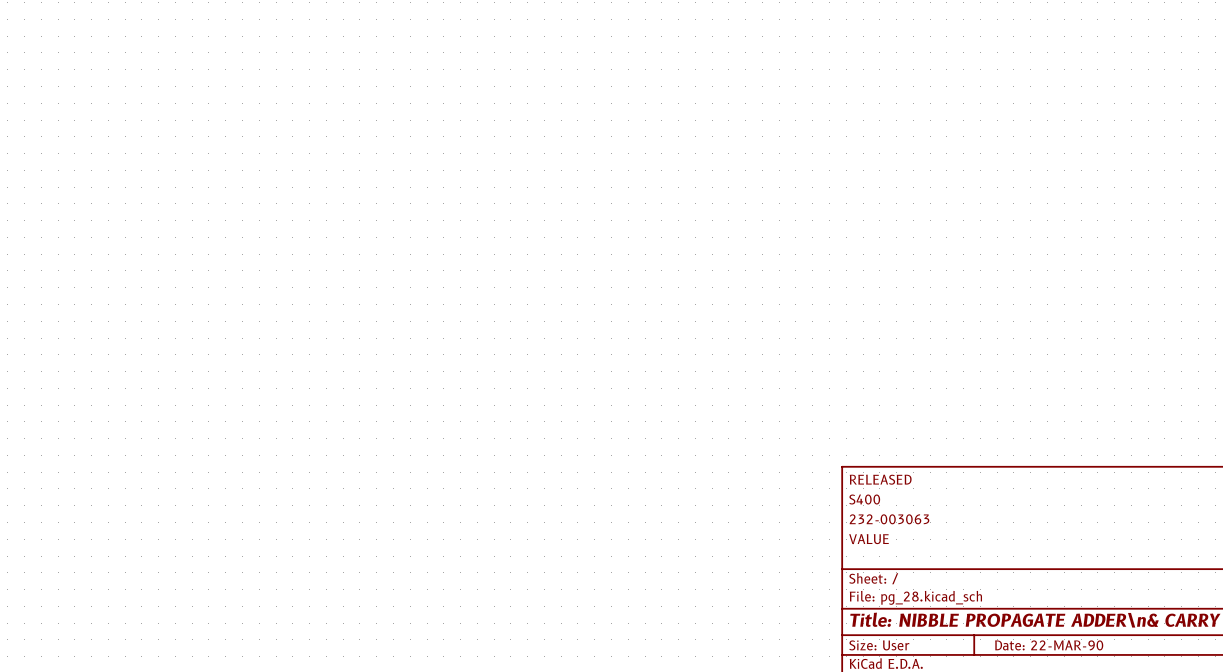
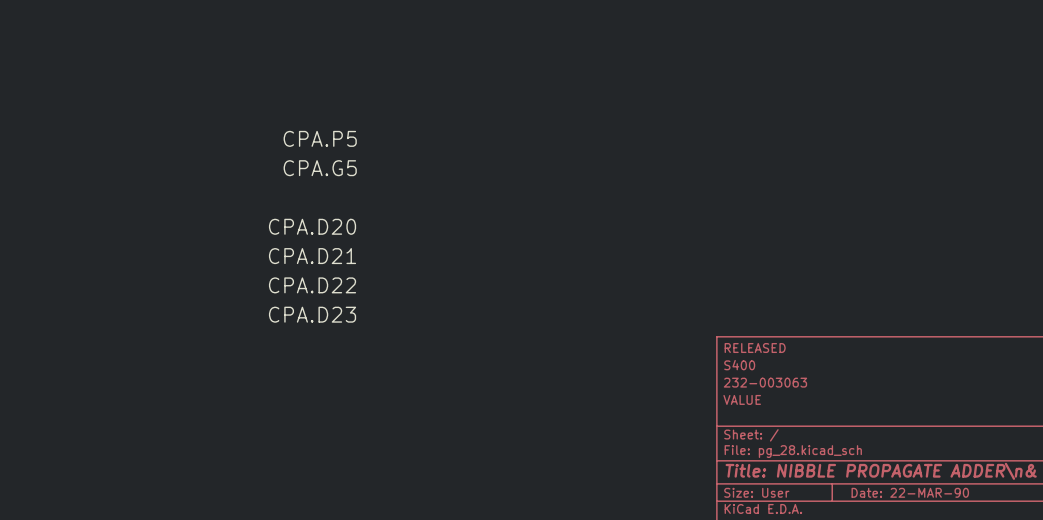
label: none -> CPA.P5 (320, 138)
label: none -> CPA.G5 (320, 168)
label: none -> CPA.D20 (312, 226)
label: none -> CPA.D21 (312, 256)
label: none -> CPA.D22 (312, 285)
label: none -> CPA.D23 (312, 314)

